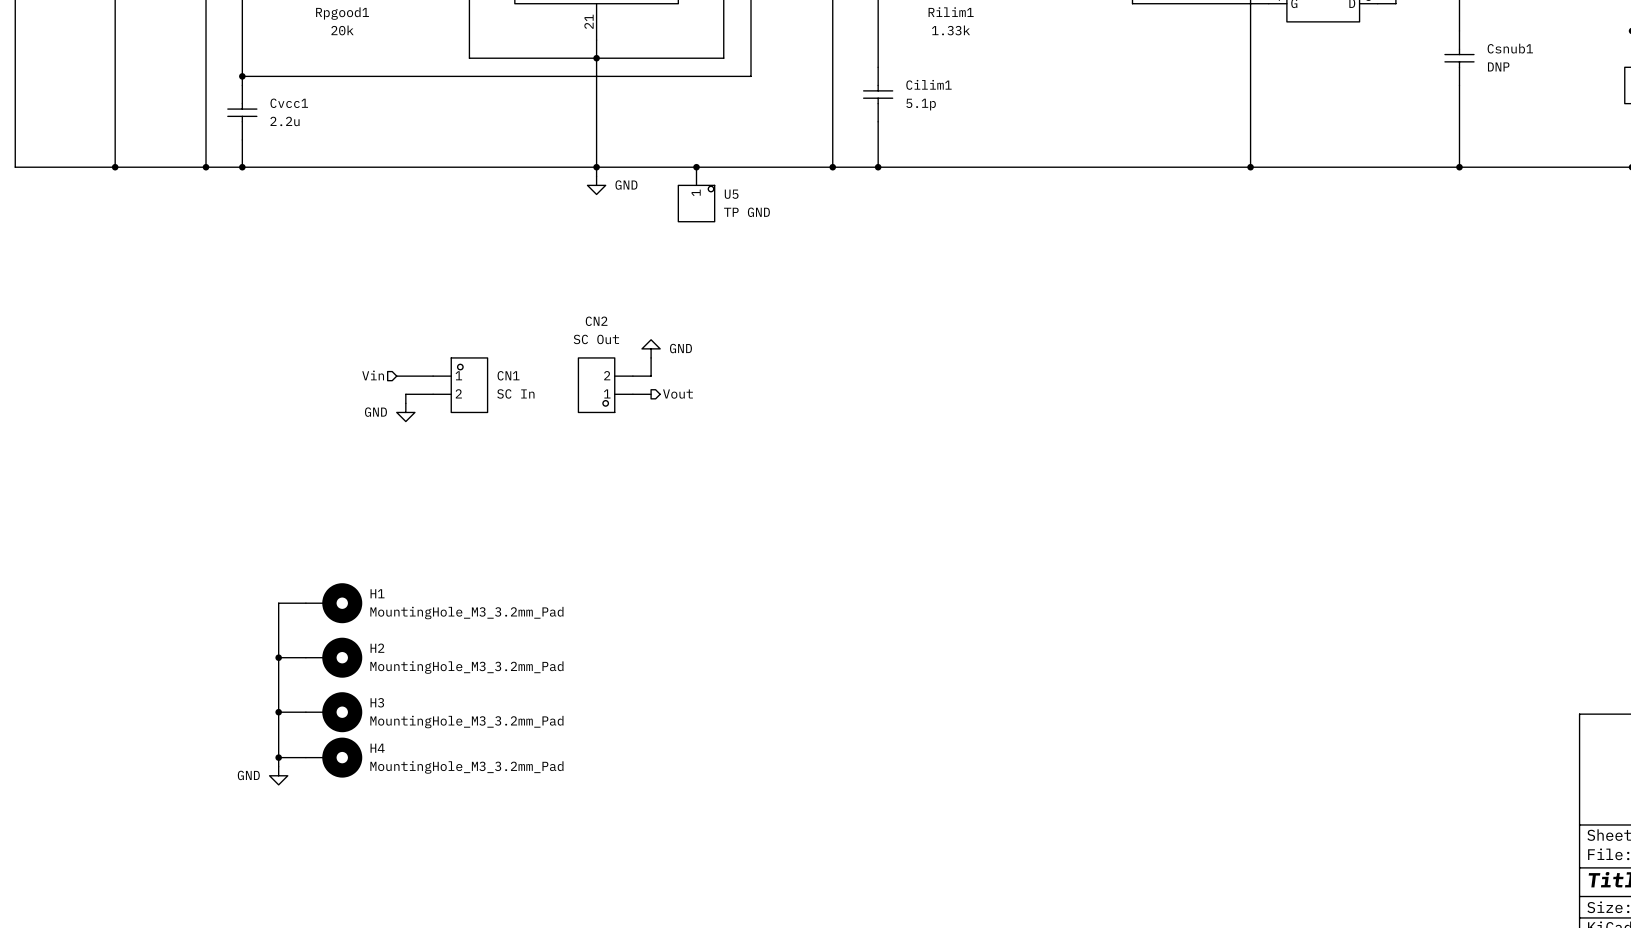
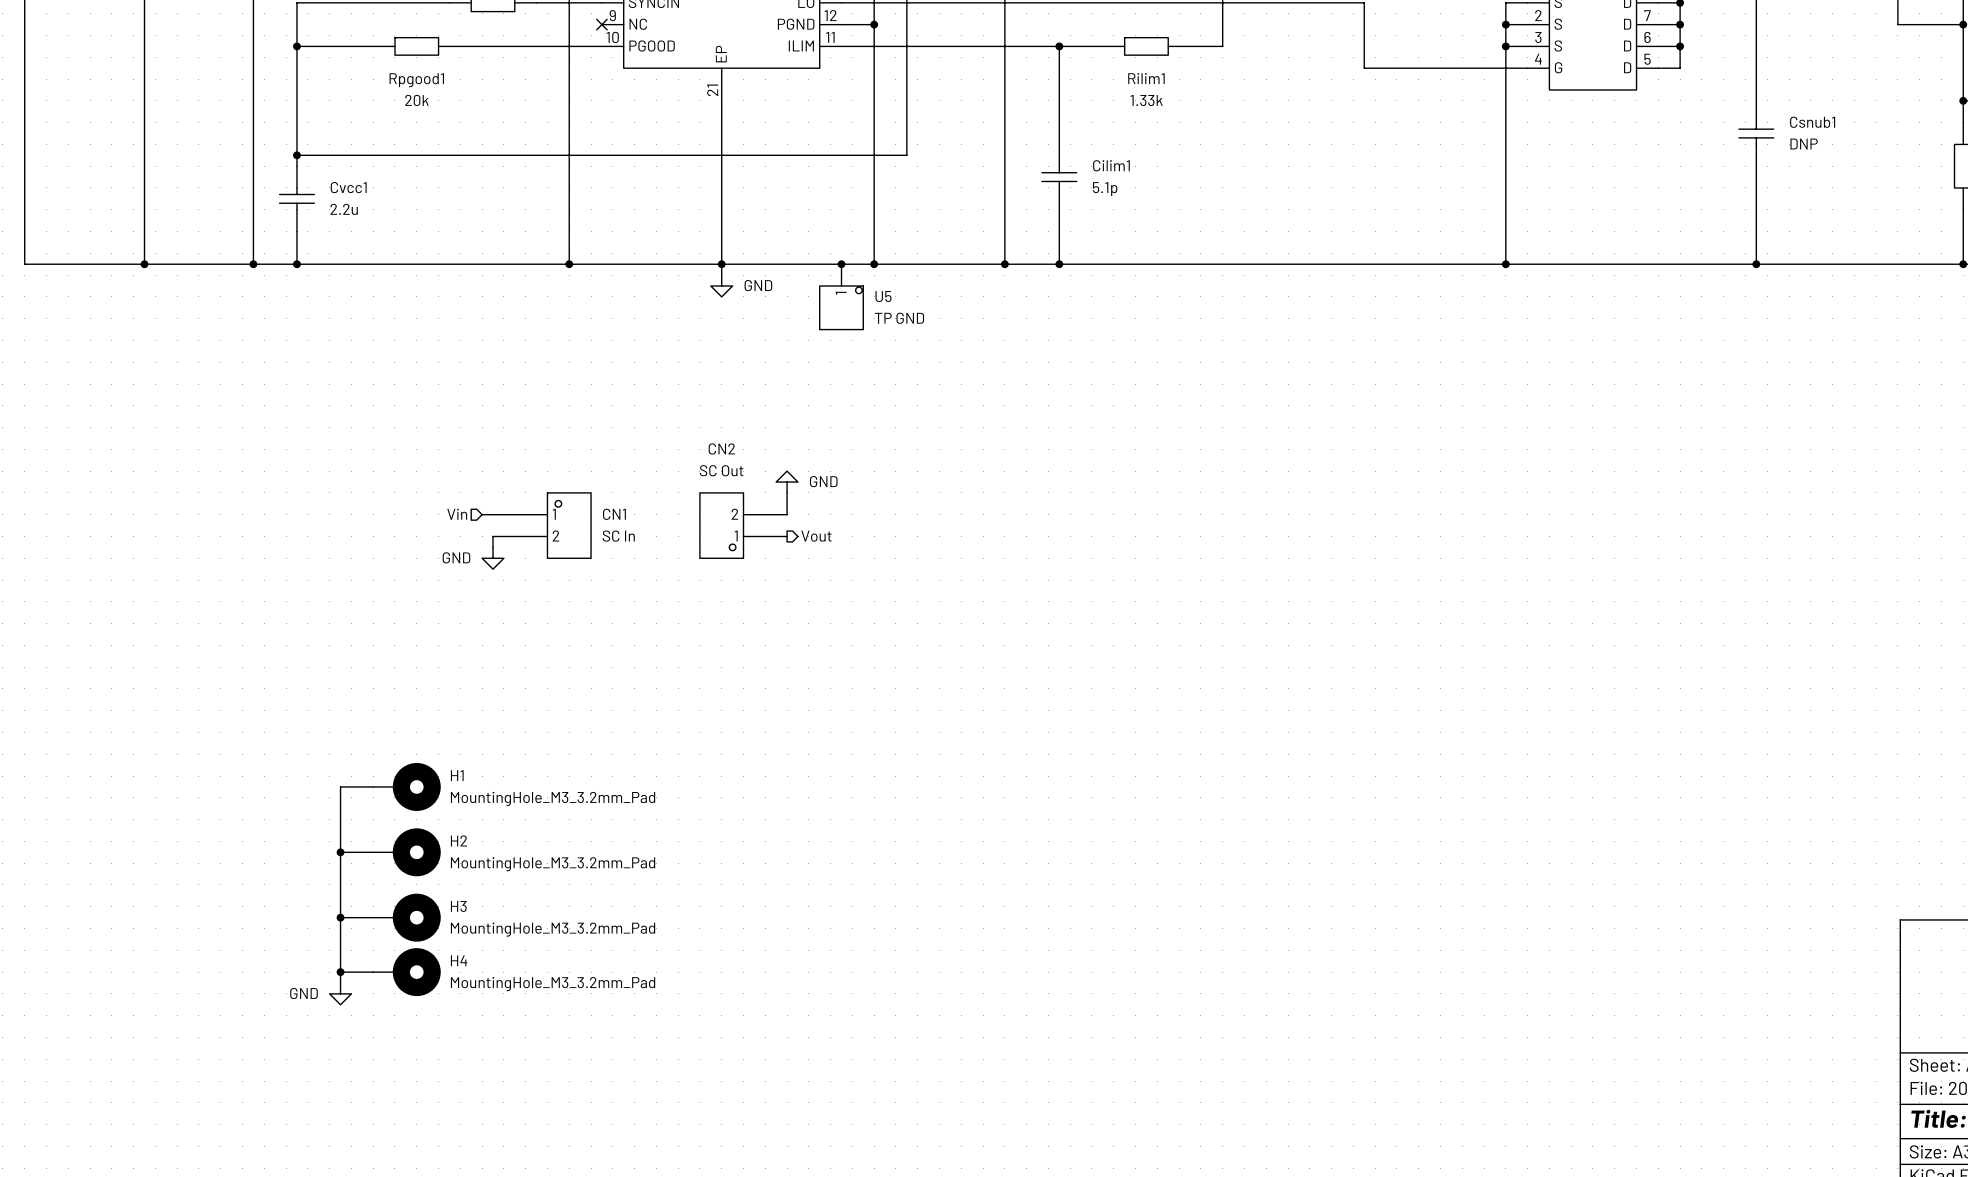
wire: (469, 58) (723, 58) -> (569, 133) (569, 264)
junction: (596, 58) -> none
wire: none -> (874, 133) (874, 264)
junction: none -> (569, 264)
junction: none -> (874, 264)

